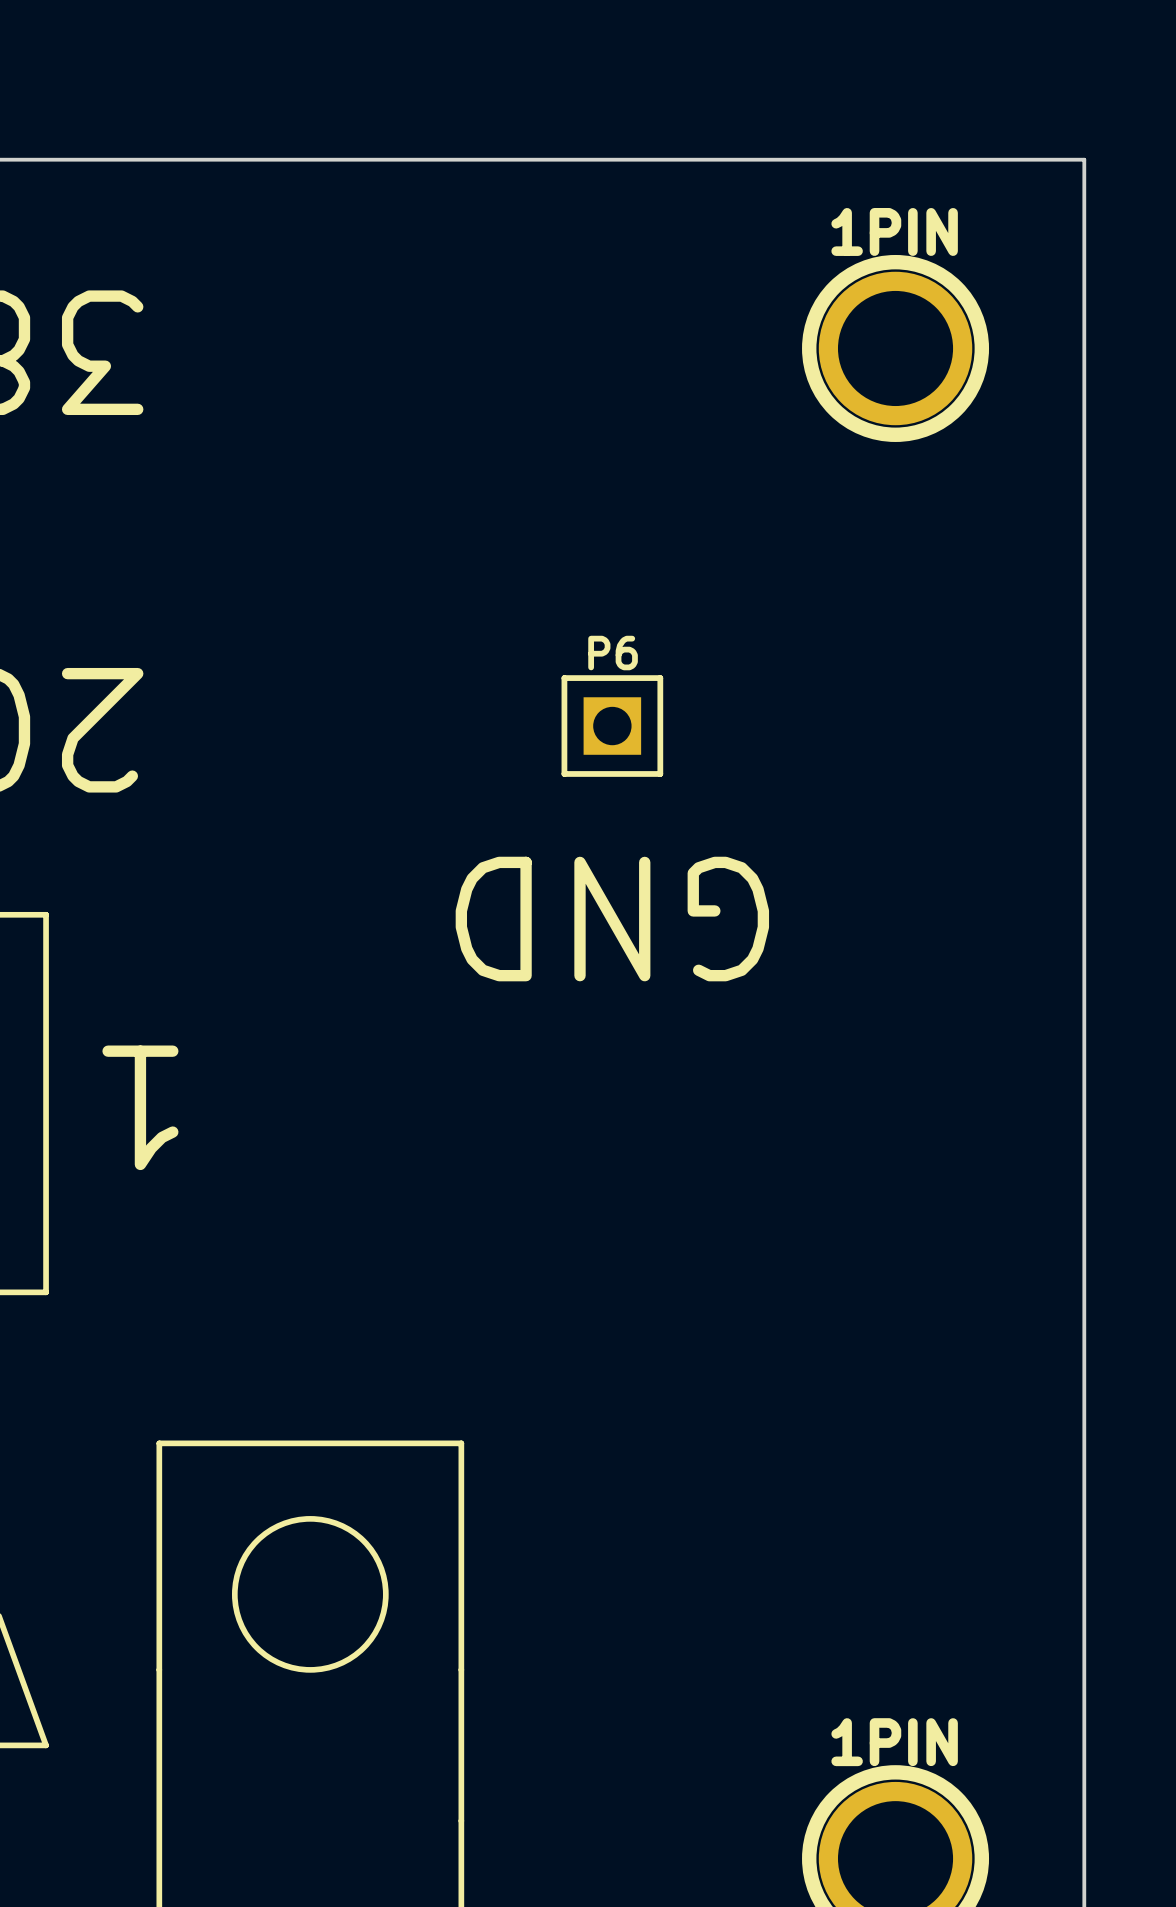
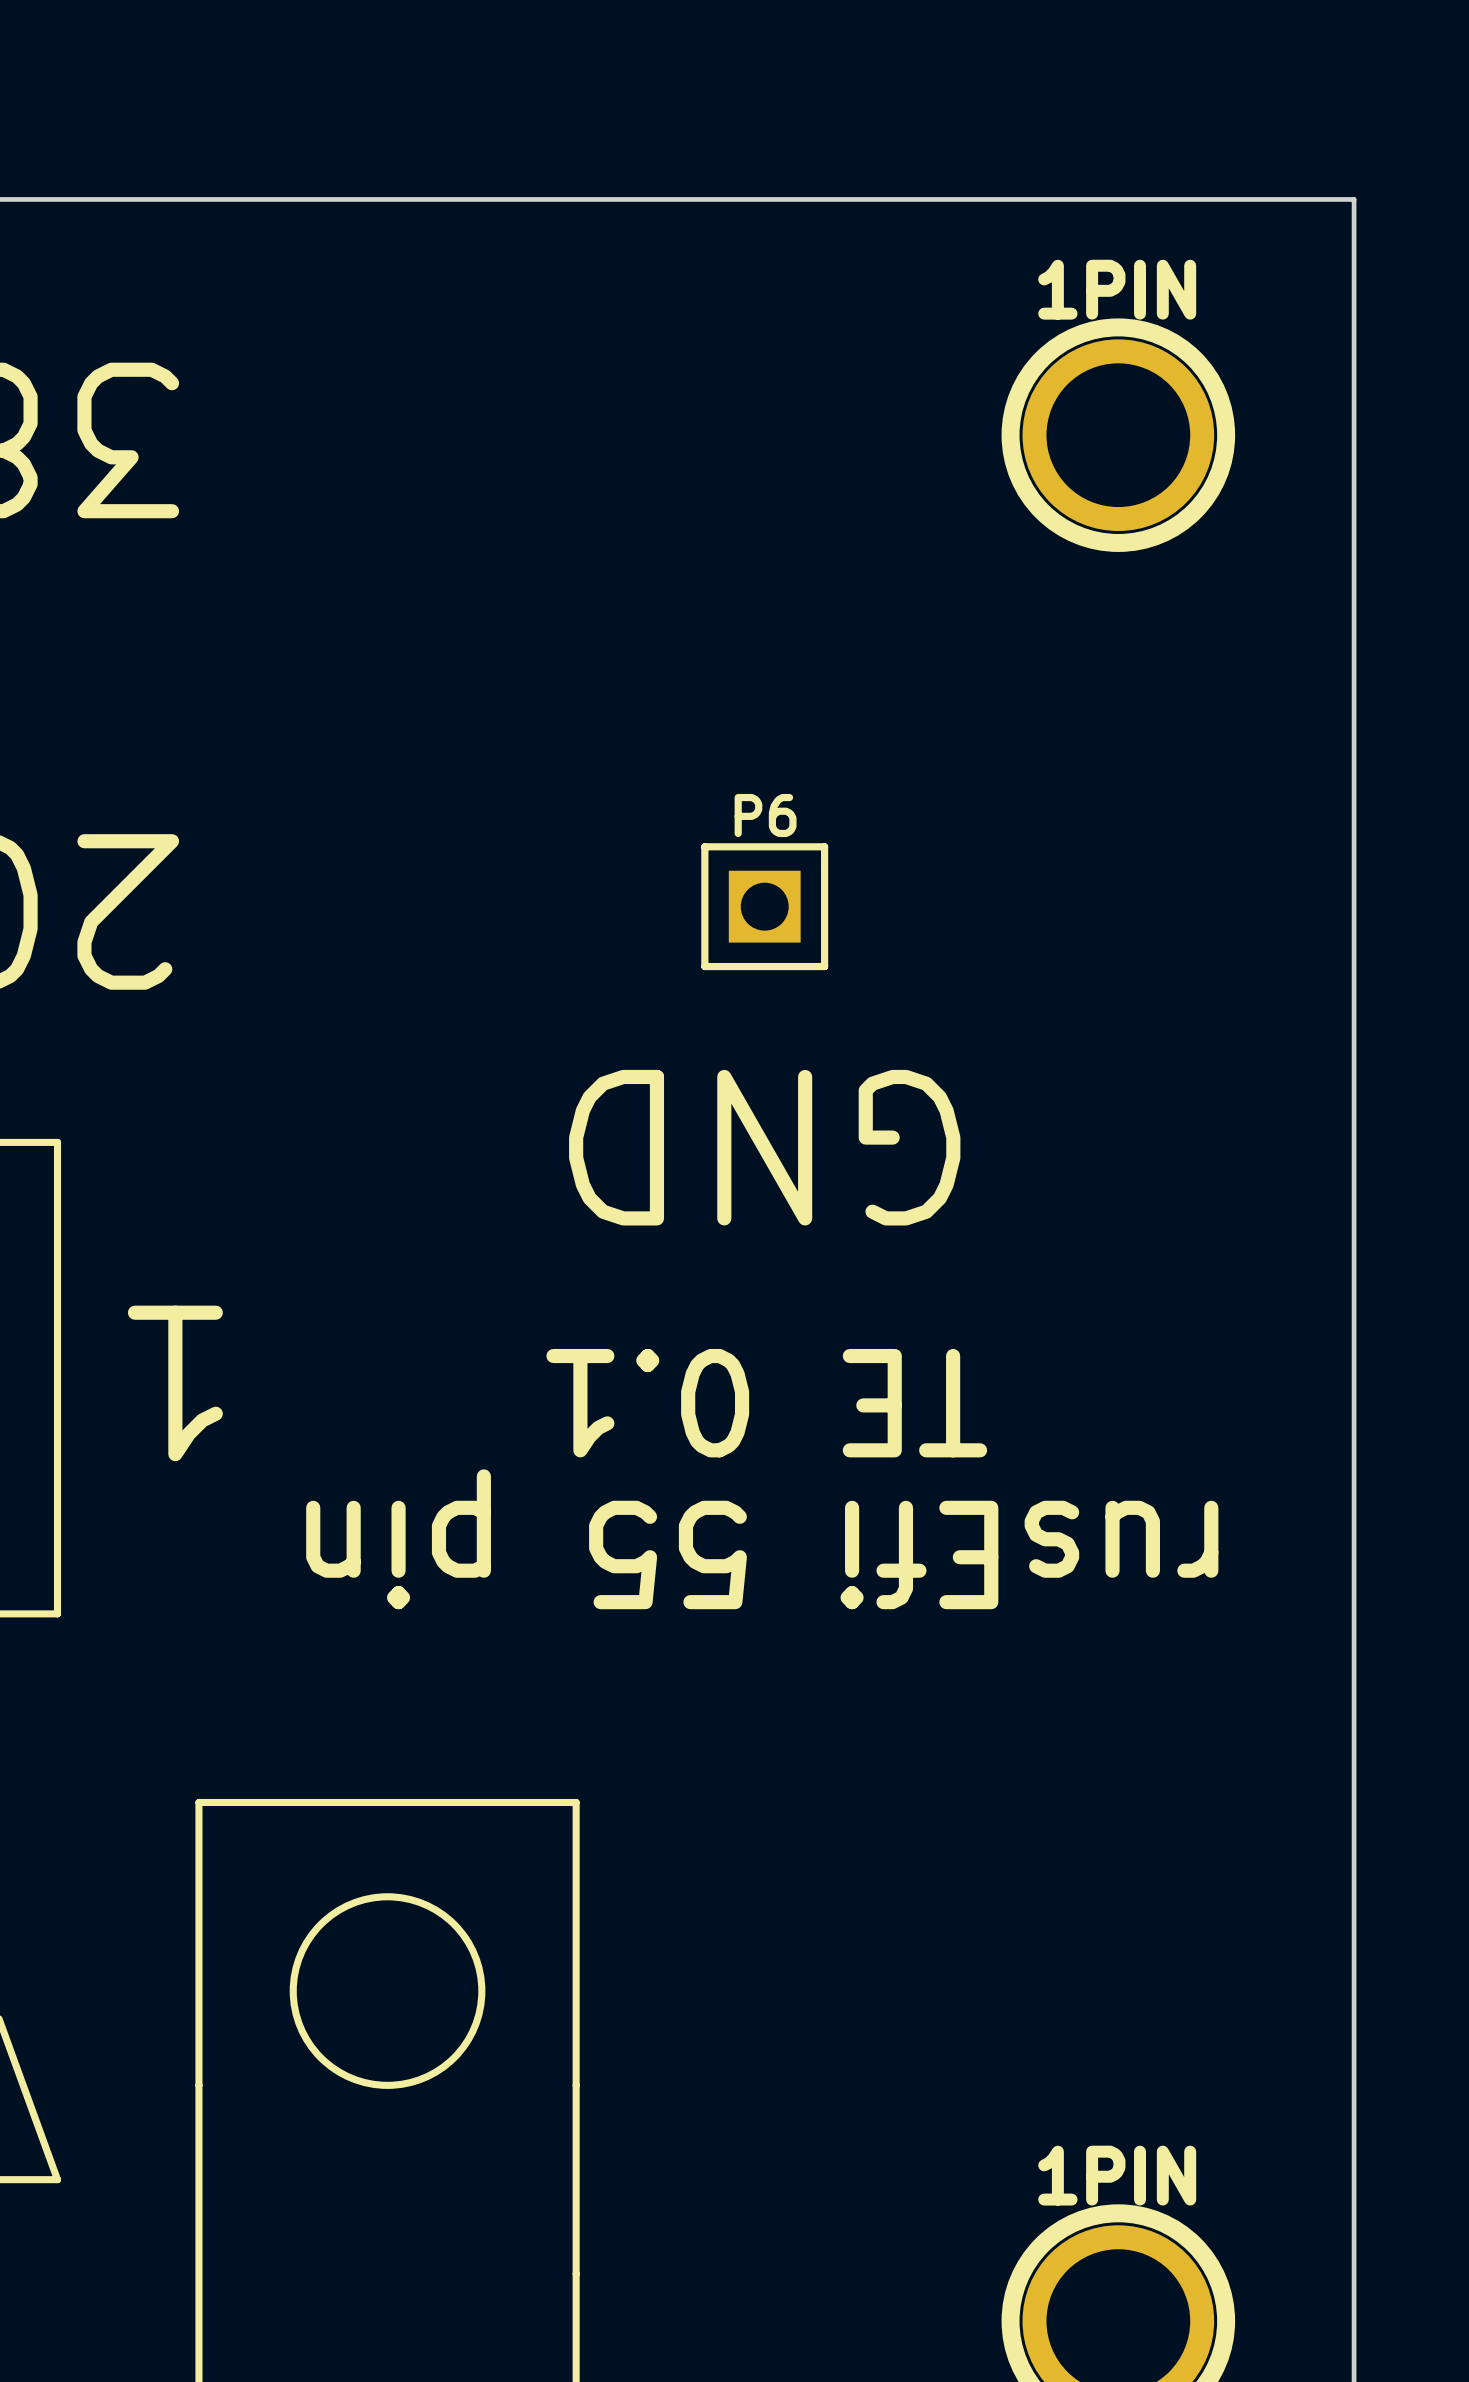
text: none -> TE 0.1 (766, 1403)
text: none -> rusEfi 55 pin (762, 1539)

